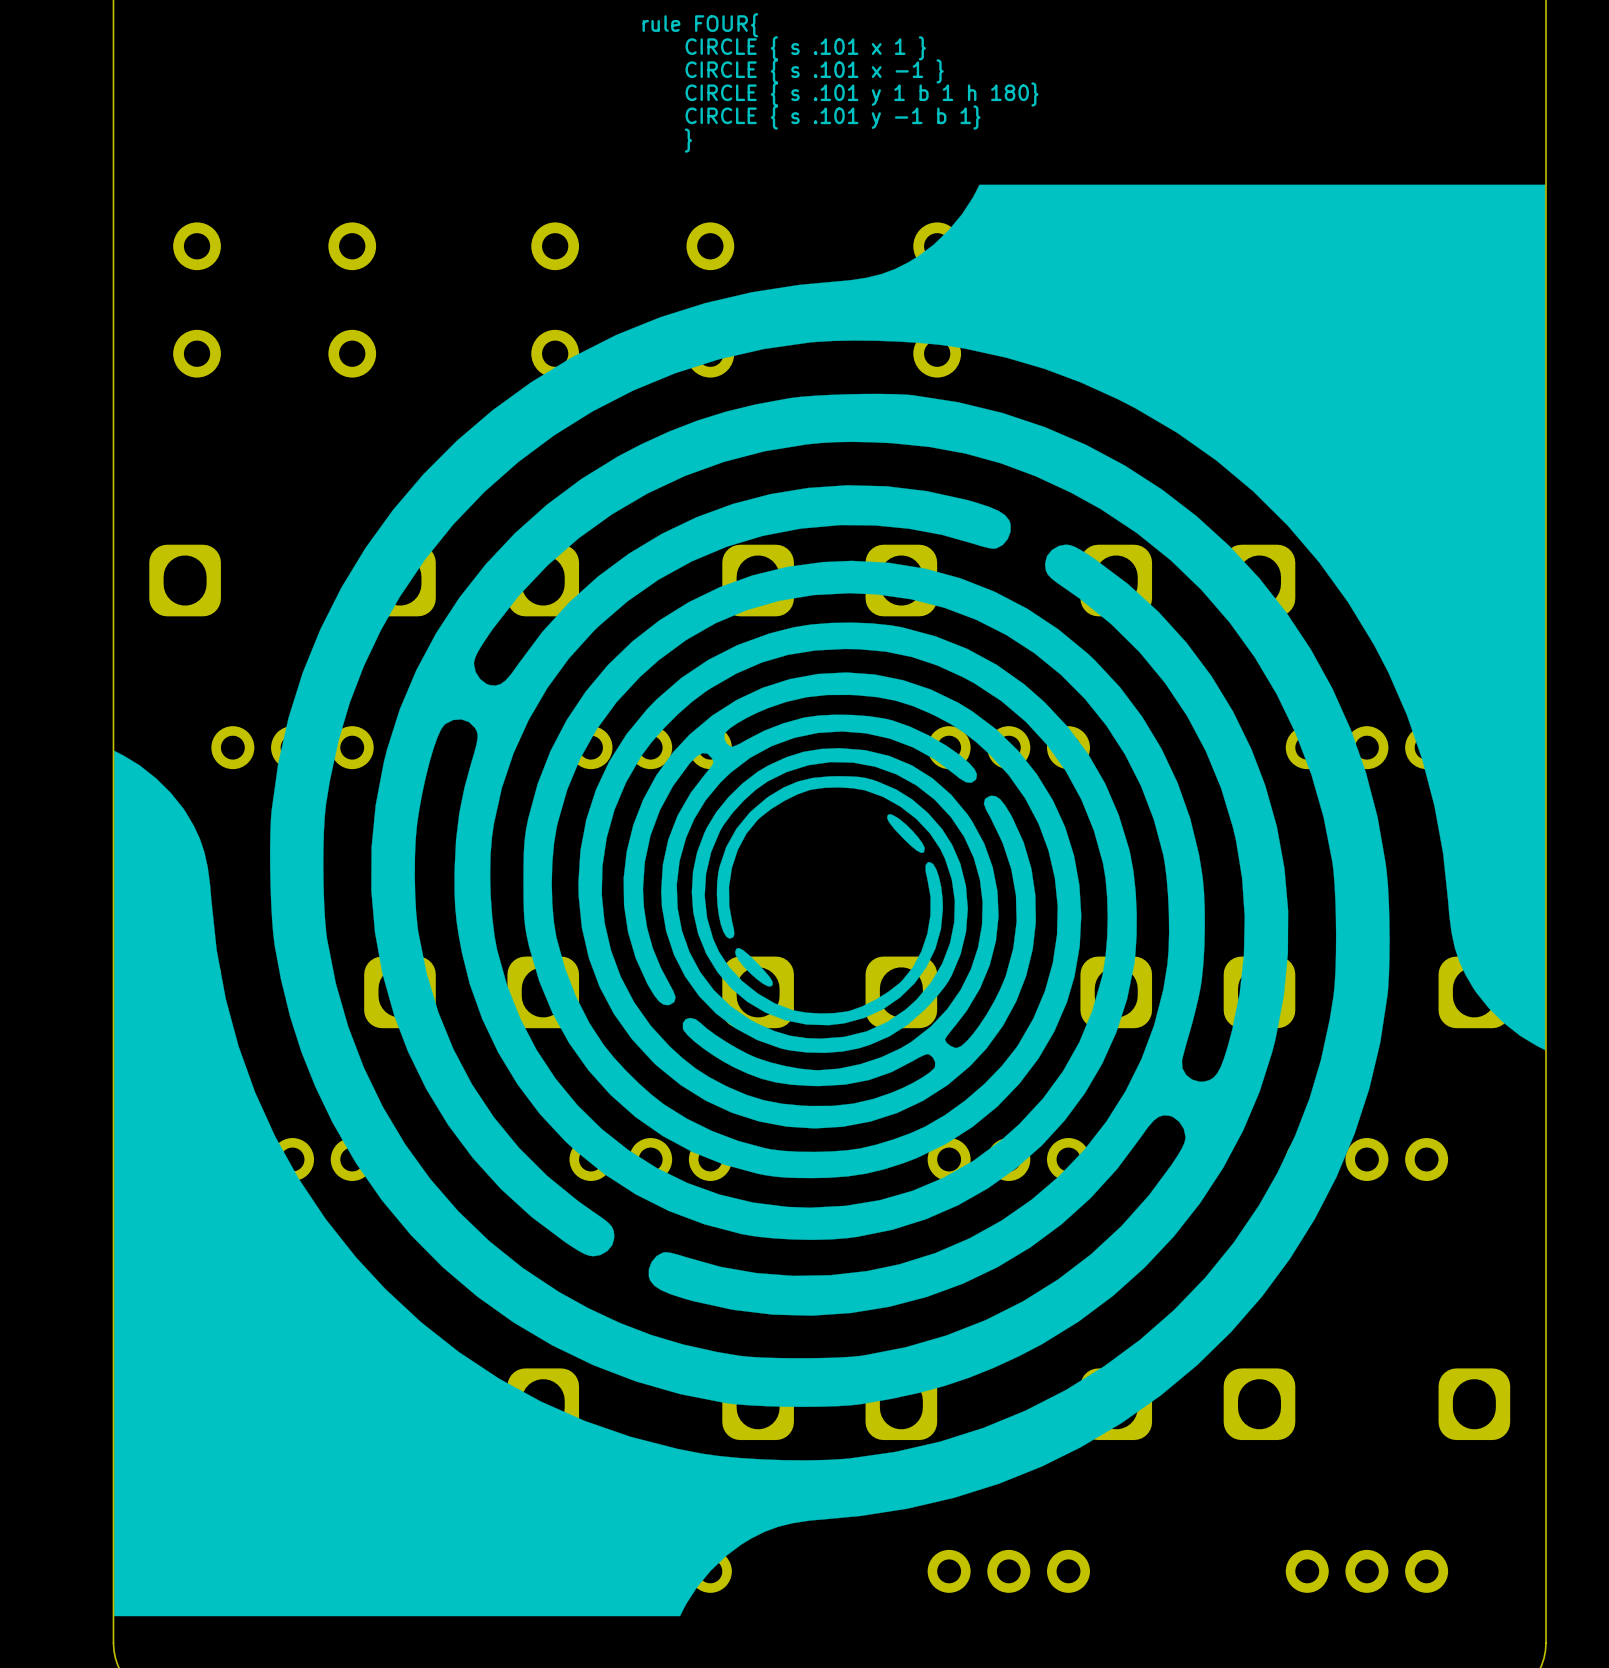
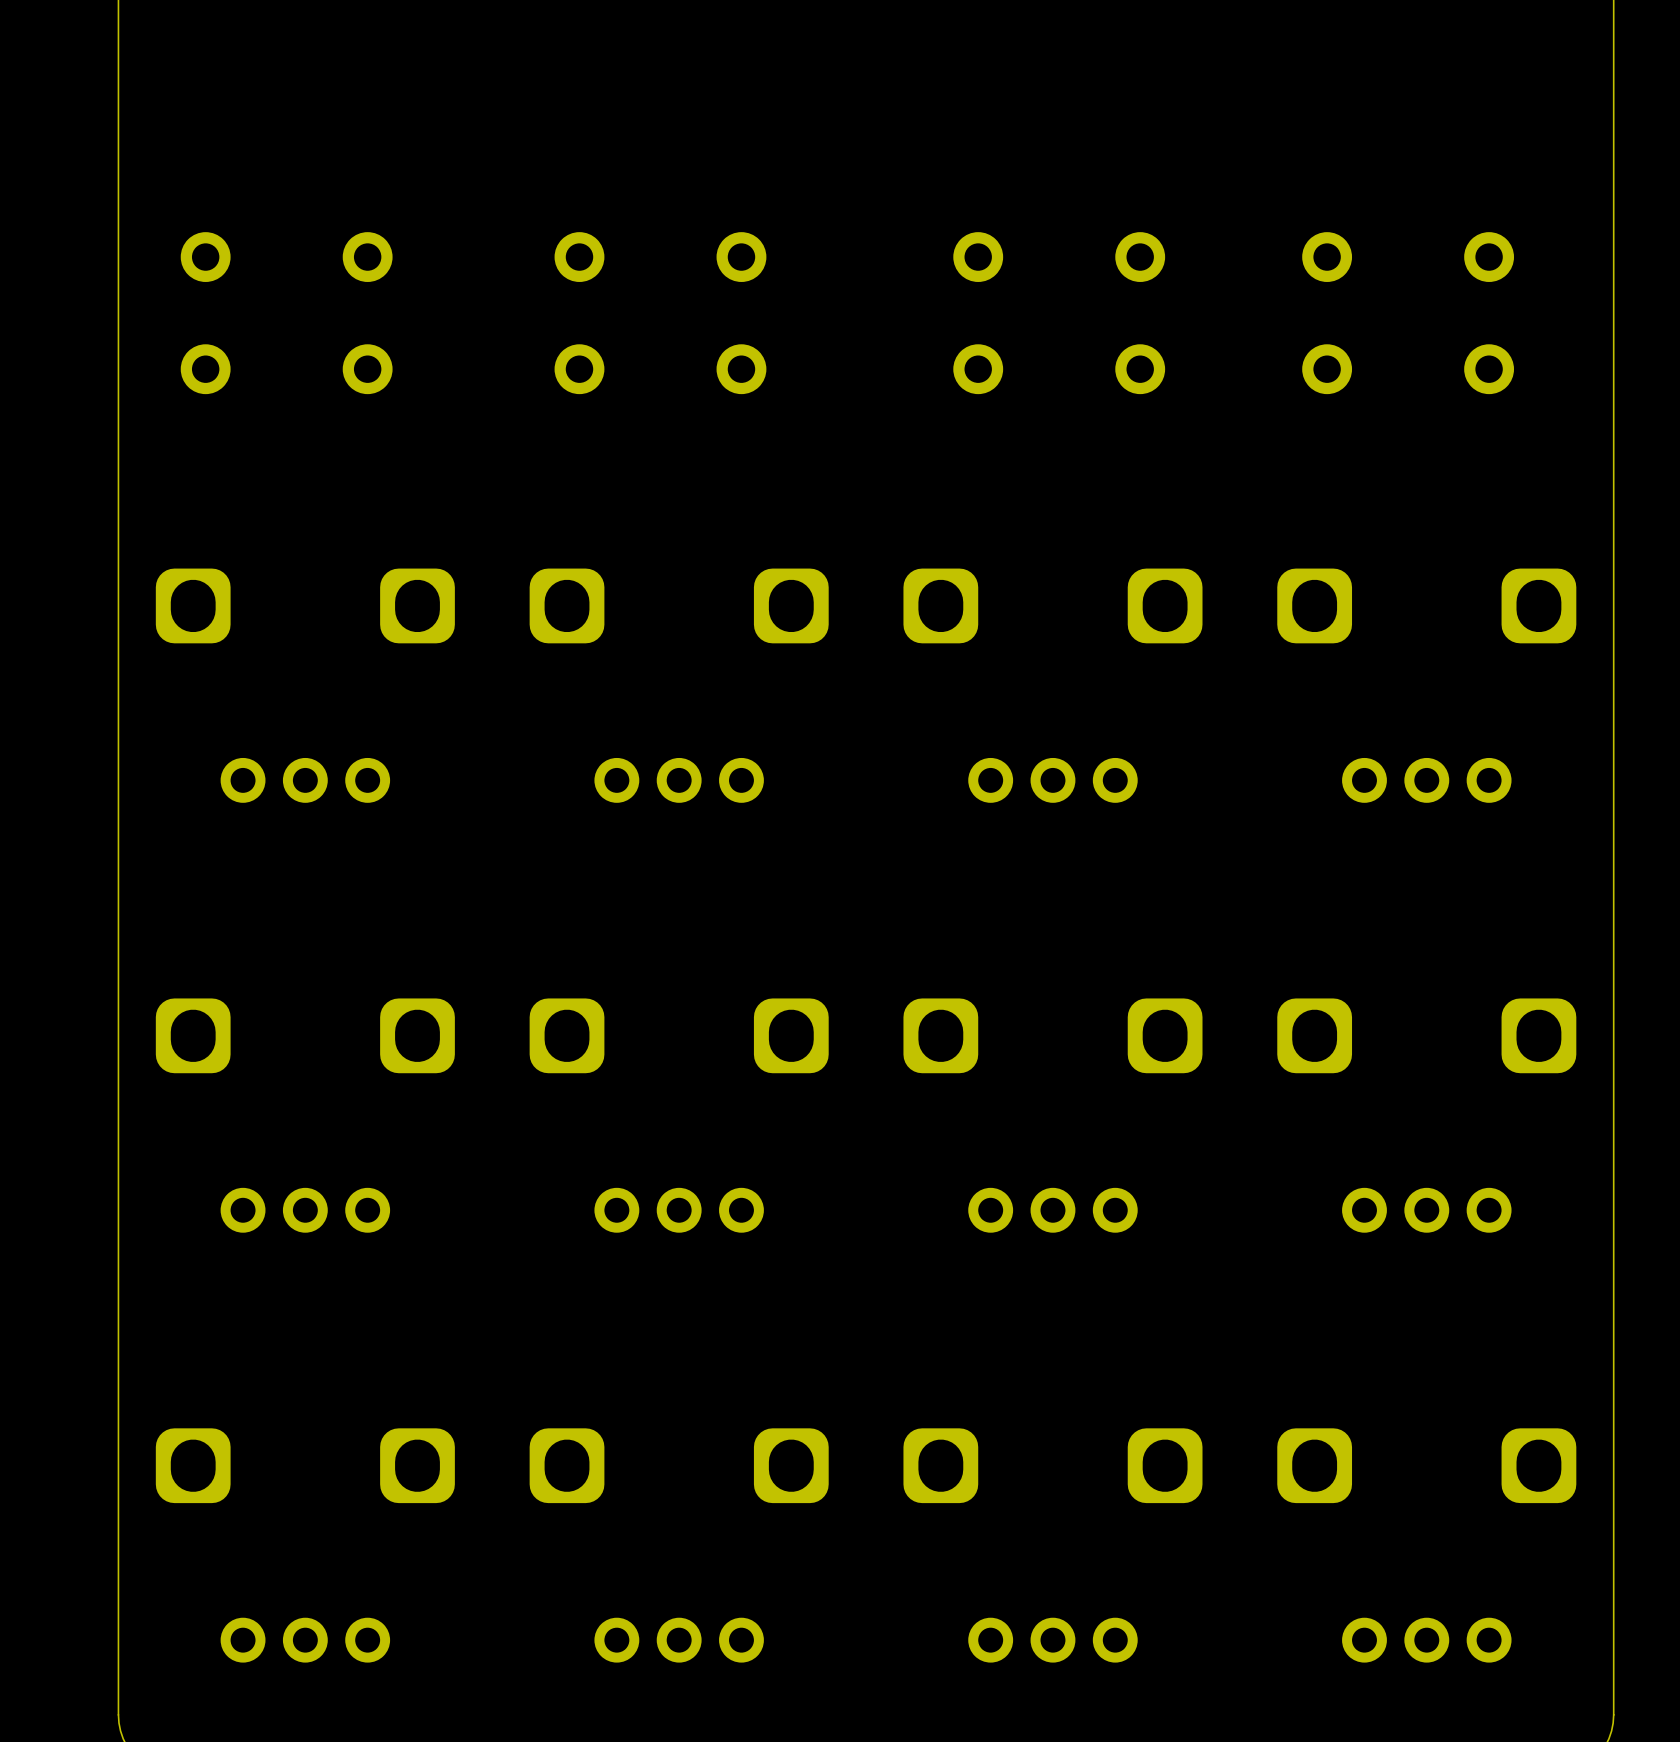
text: rule FOUR{ (700, 25) -> none
text: CIRCLE { s .101 x 1 } (805, 48) -> none
text: CIRCLE { s .101 x -1 } (814, 71) -> none
text: CIRCLE { s .101 y 1 b 1 h 180} (862, 94) -> none
text: CIRCLE { s .101 y -1 b 1} (833, 117) -> none
text: } (688, 140) -> none
drawing: [114, 184, 1546, 1617] -> none

